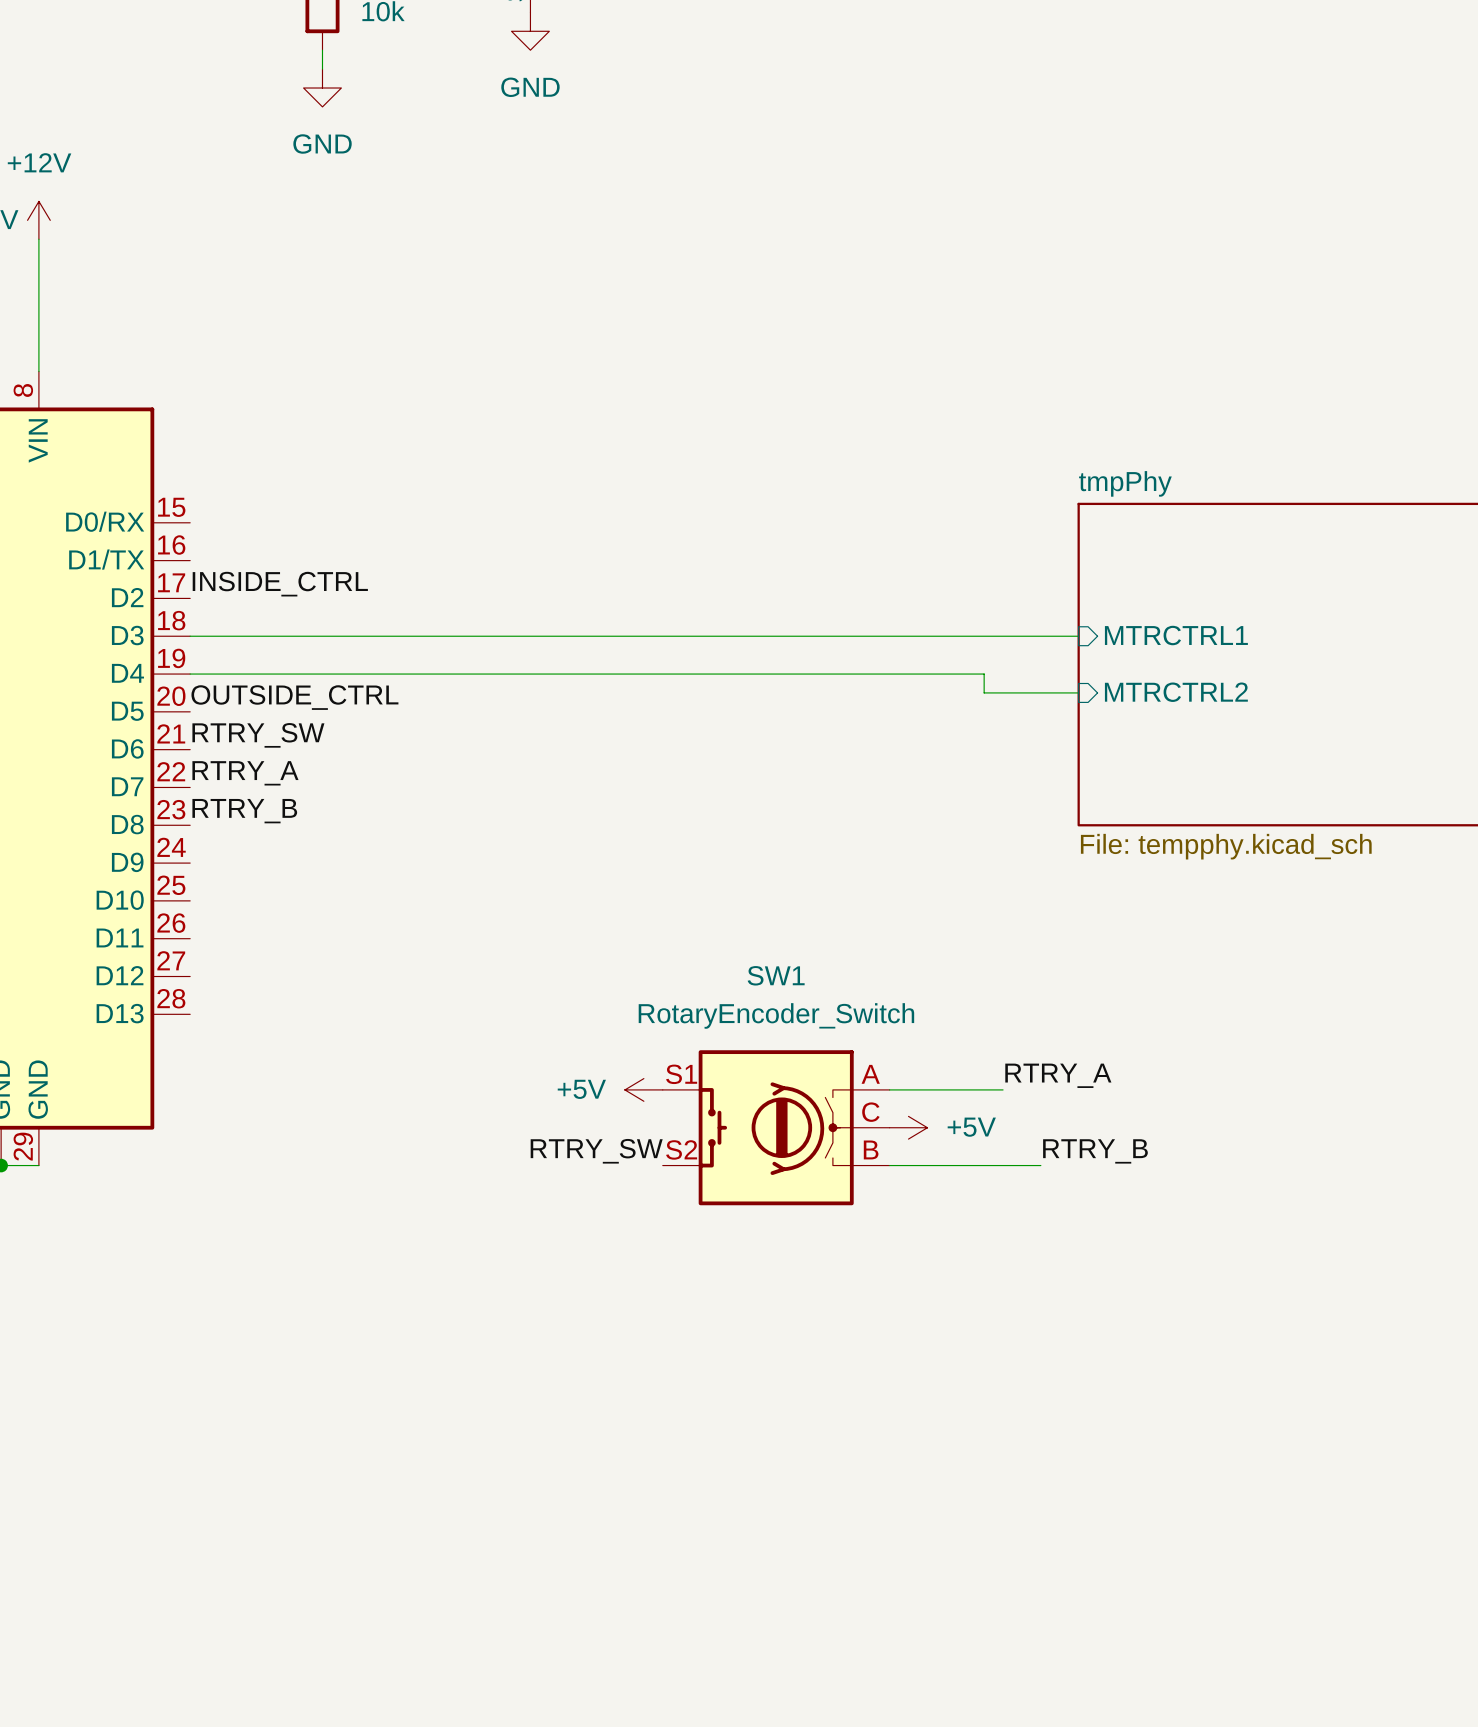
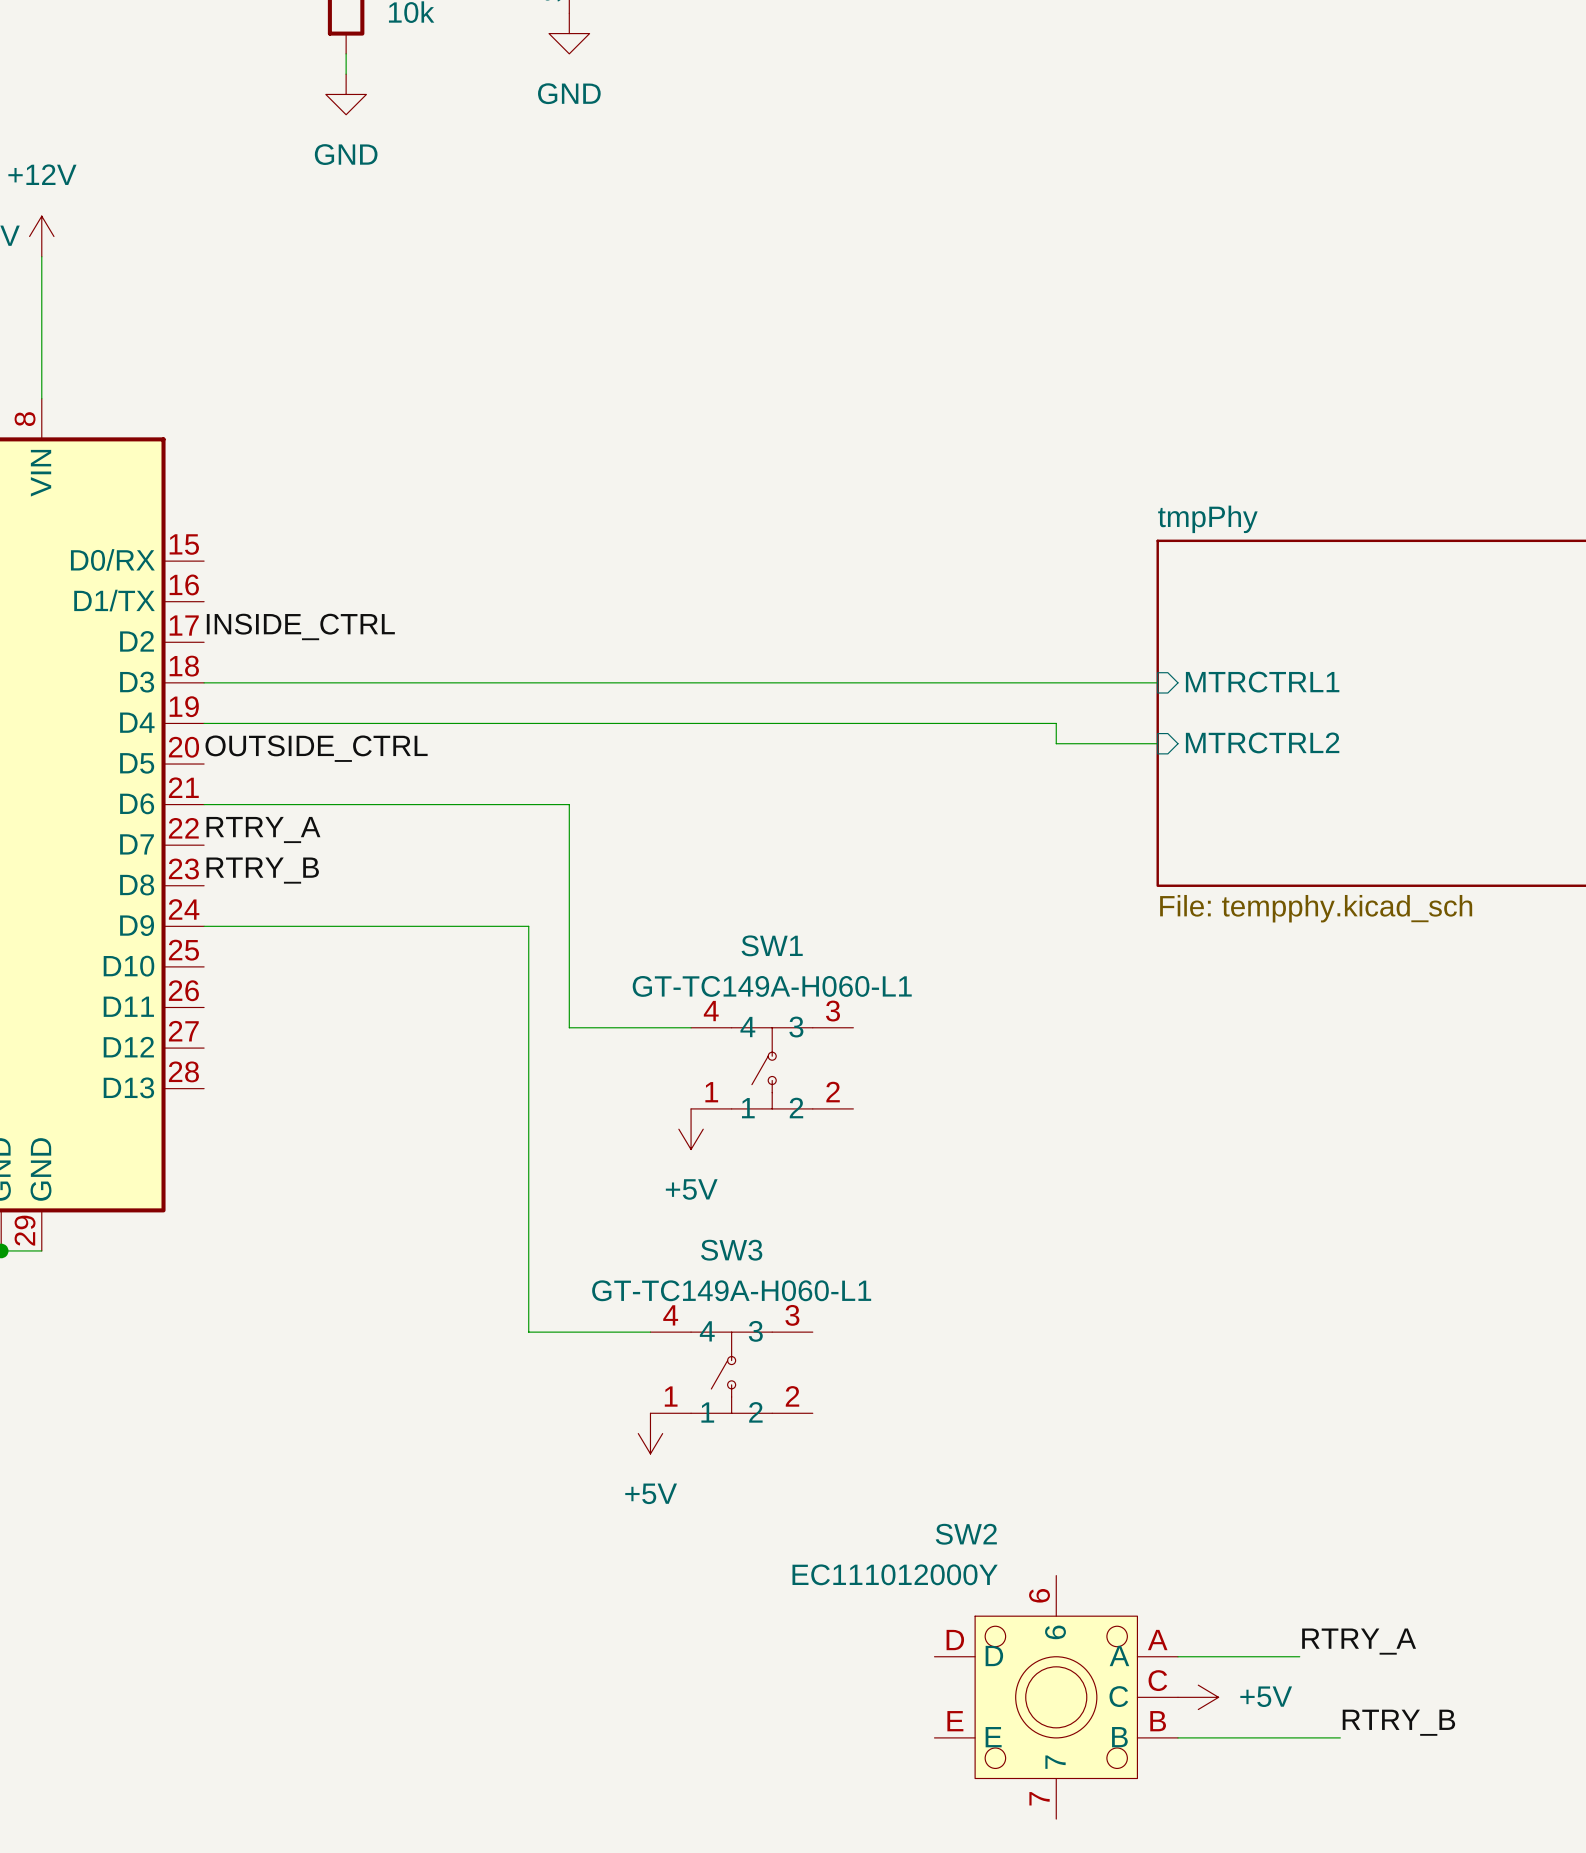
label: RTRY_SW (258, 735) -> none
wire: none -> (204, 804) (569, 804) (569, 1027) (691, 1027)
wire: none -> (204, 926) (528, 926) (528, 1332) (650, 1332)
SW1 name position: SW1 (776, 975) -> SW1 (772, 945)
SW1 value: RotaryEncoder_Switch (776, 1015) -> GT-TC149A-H060-L1 (772, 986)
SW1 symbol: [662, 1050, 890, 1206] -> [691, 1027, 854, 1109]
label: RTRY_A (1058, 1075) -> none
power symbol rotation: 0° (643, 1089) -> 90° counterclockwise (691, 1129)
power symbol position: +5V (643, 1089) -> +5V (691, 1129)
wire: (889, 1089) (1003, 1089) -> none
power symbol: +5V (908, 1127) -> none
label: RTRY_SW (596, 1151) -> none
label: RTRY_B (1095, 1151) -> none
wire: (889, 1165) (1040, 1165) -> none
SW3: none -> GT-TC149A-H060-L1 (731, 1372)
power symbol: none -> +5V (650, 1433)
label: none -> RTRY_A (1359, 1641)
wire: none -> (1178, 1656) (1299, 1656)
SW2: none -> EC111012000Y (1056, 1697)
power symbol: none -> +5V (1198, 1697)
label: none -> RTRY_B (1398, 1722)
wire: none -> (1178, 1737) (1340, 1737)

